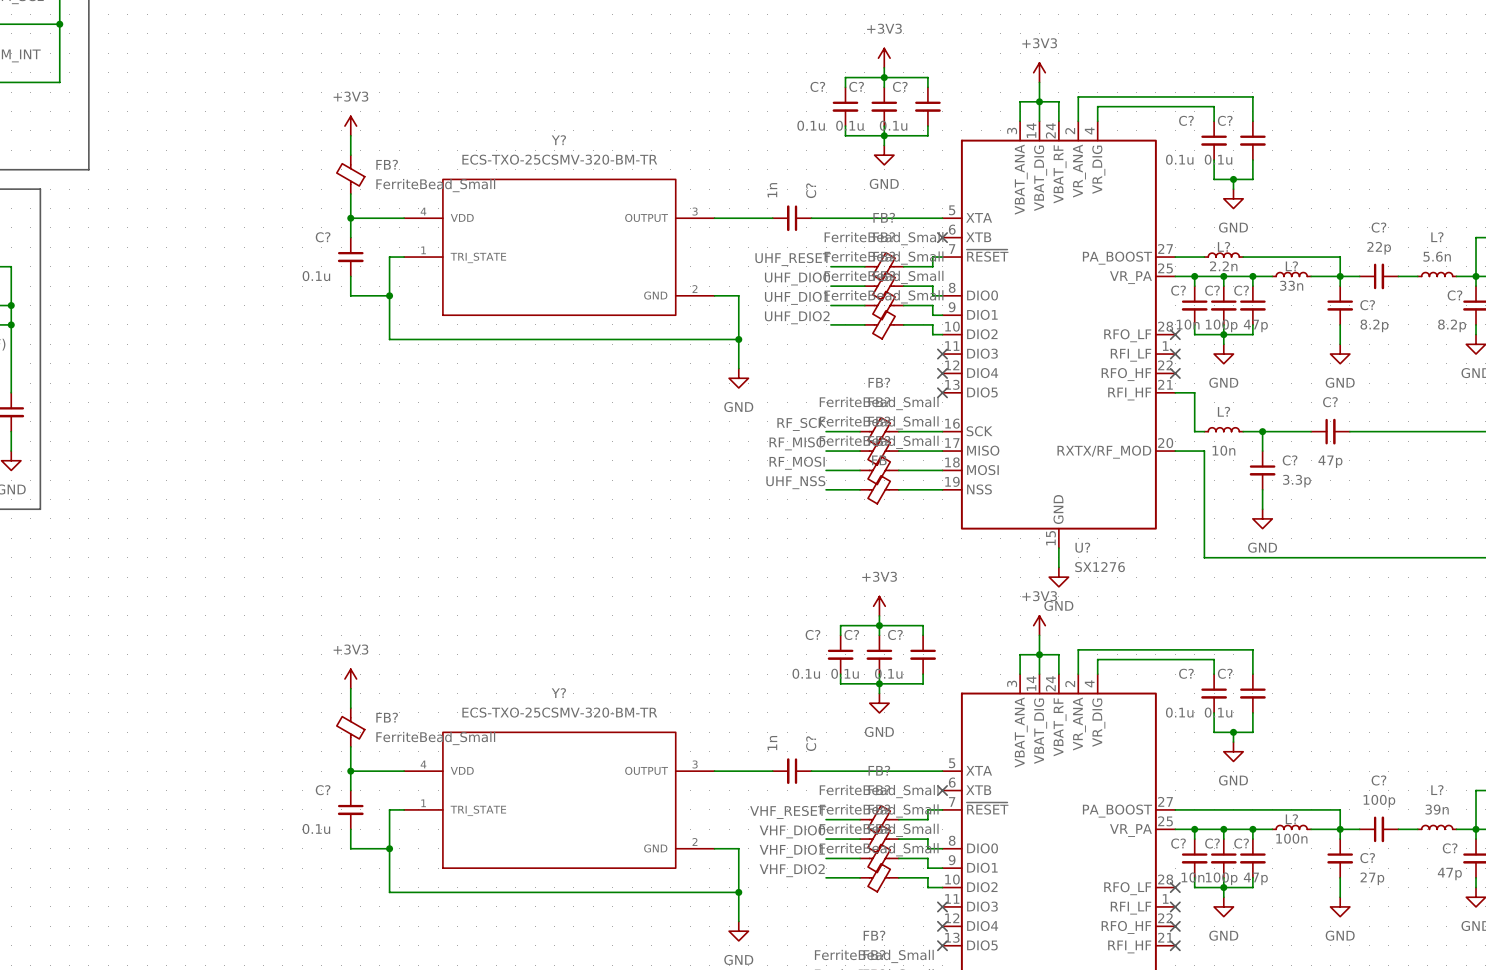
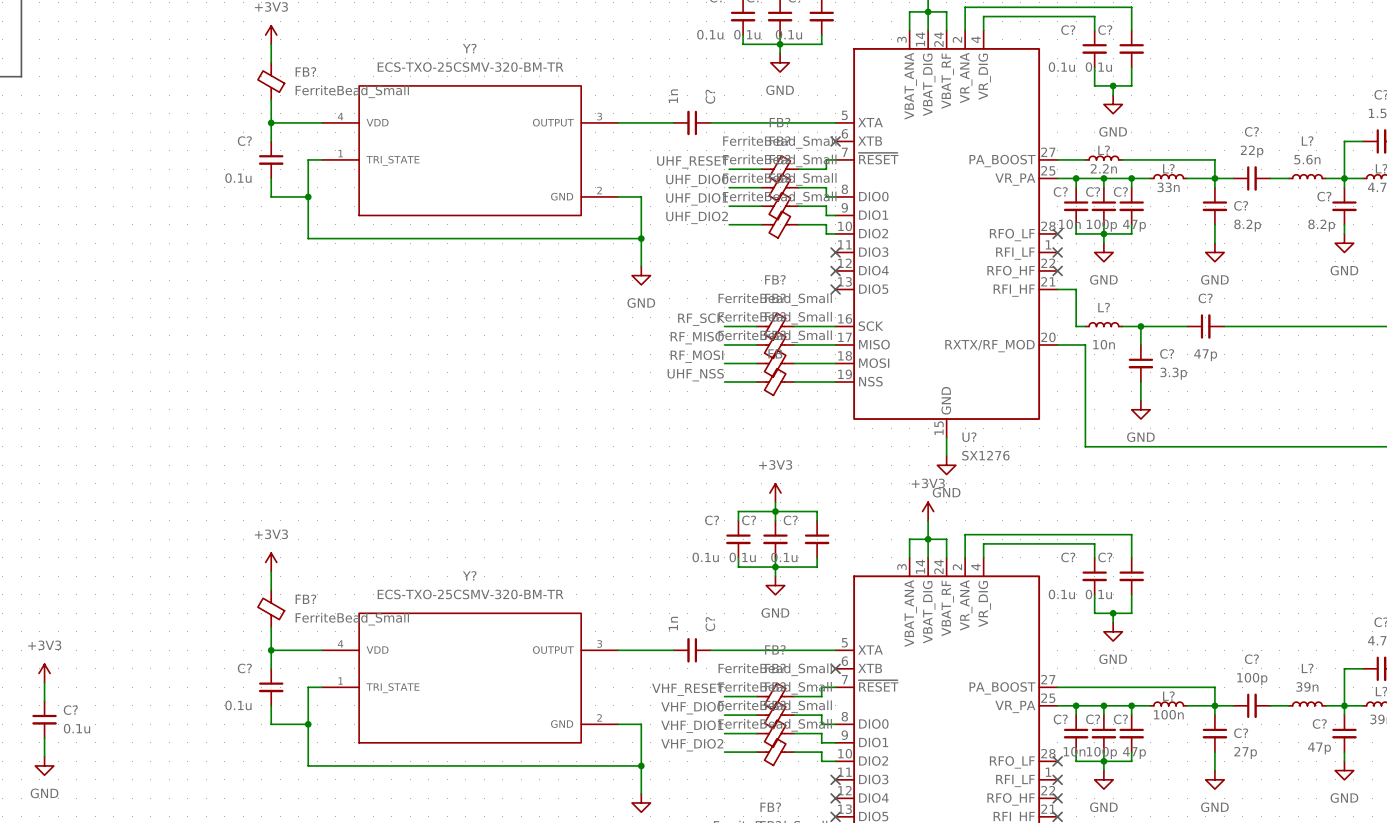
power symbol: none -> +3V3 (44, 673)
wire: none -> (44, 682) (44, 701)
C?: none -> 0.1u (44, 719)
wire: none -> (44, 738) (44, 756)
power symbol: none -> GND (44, 765)

